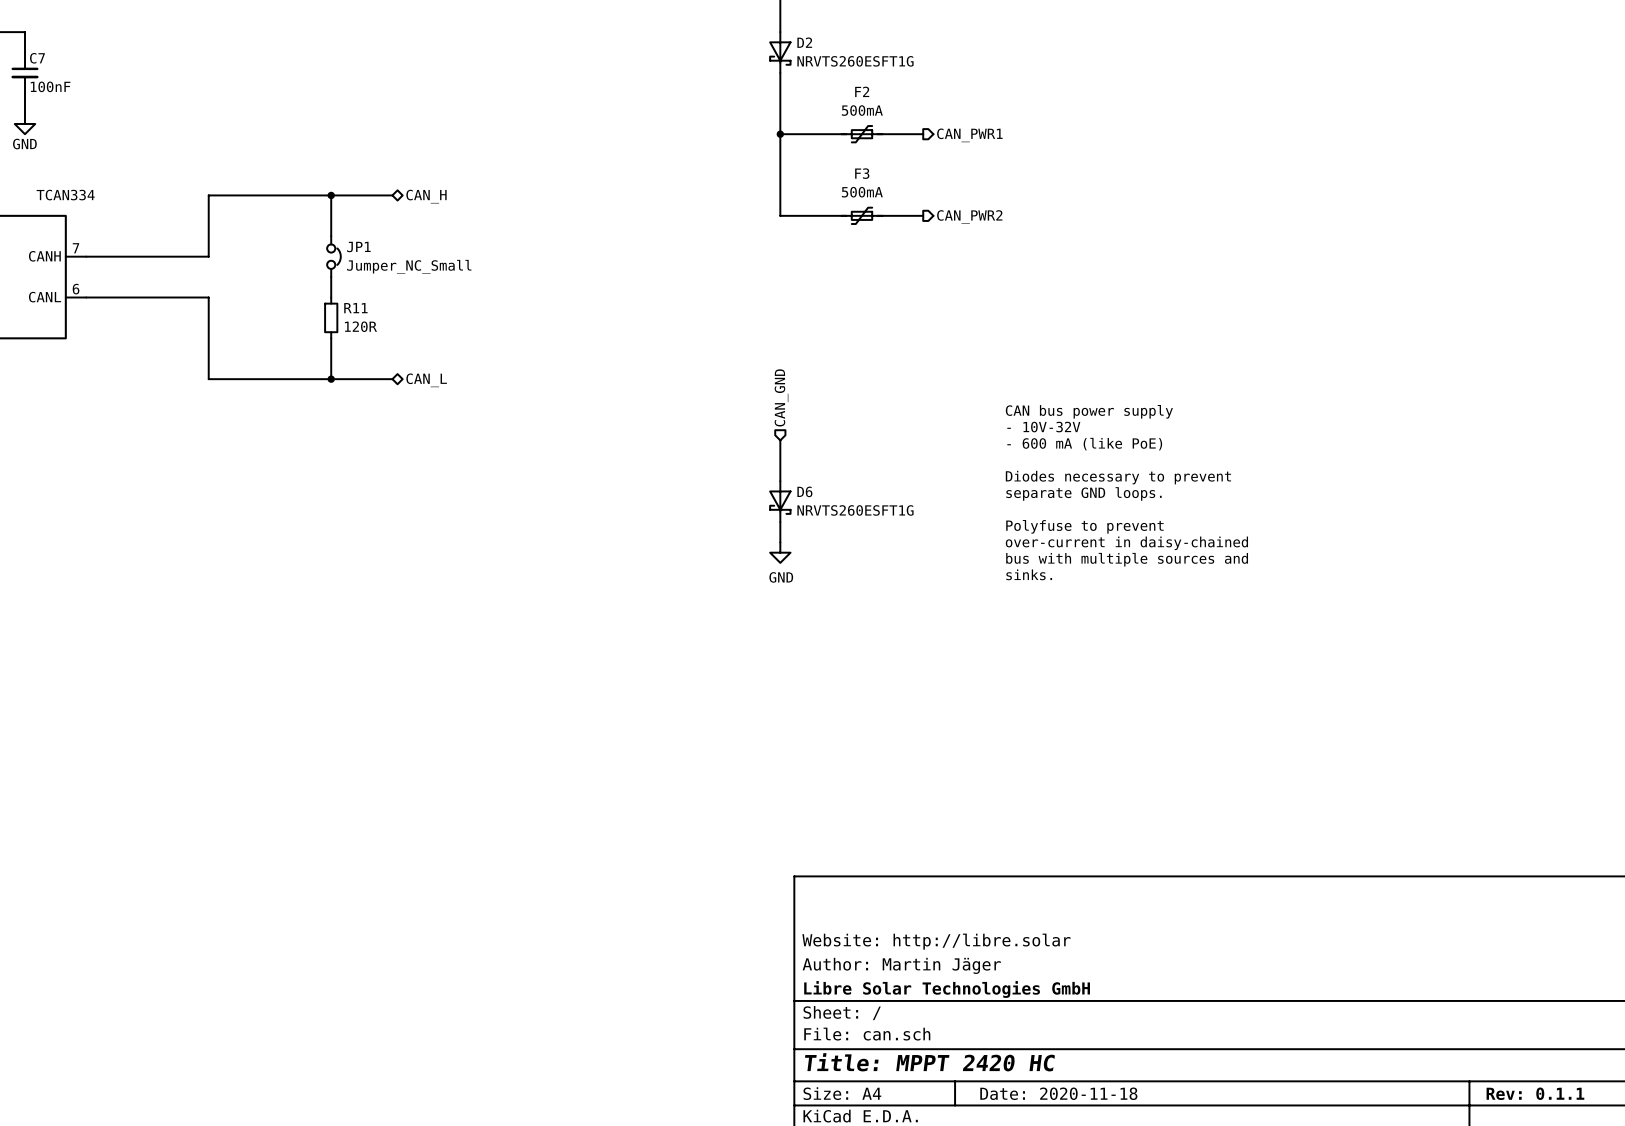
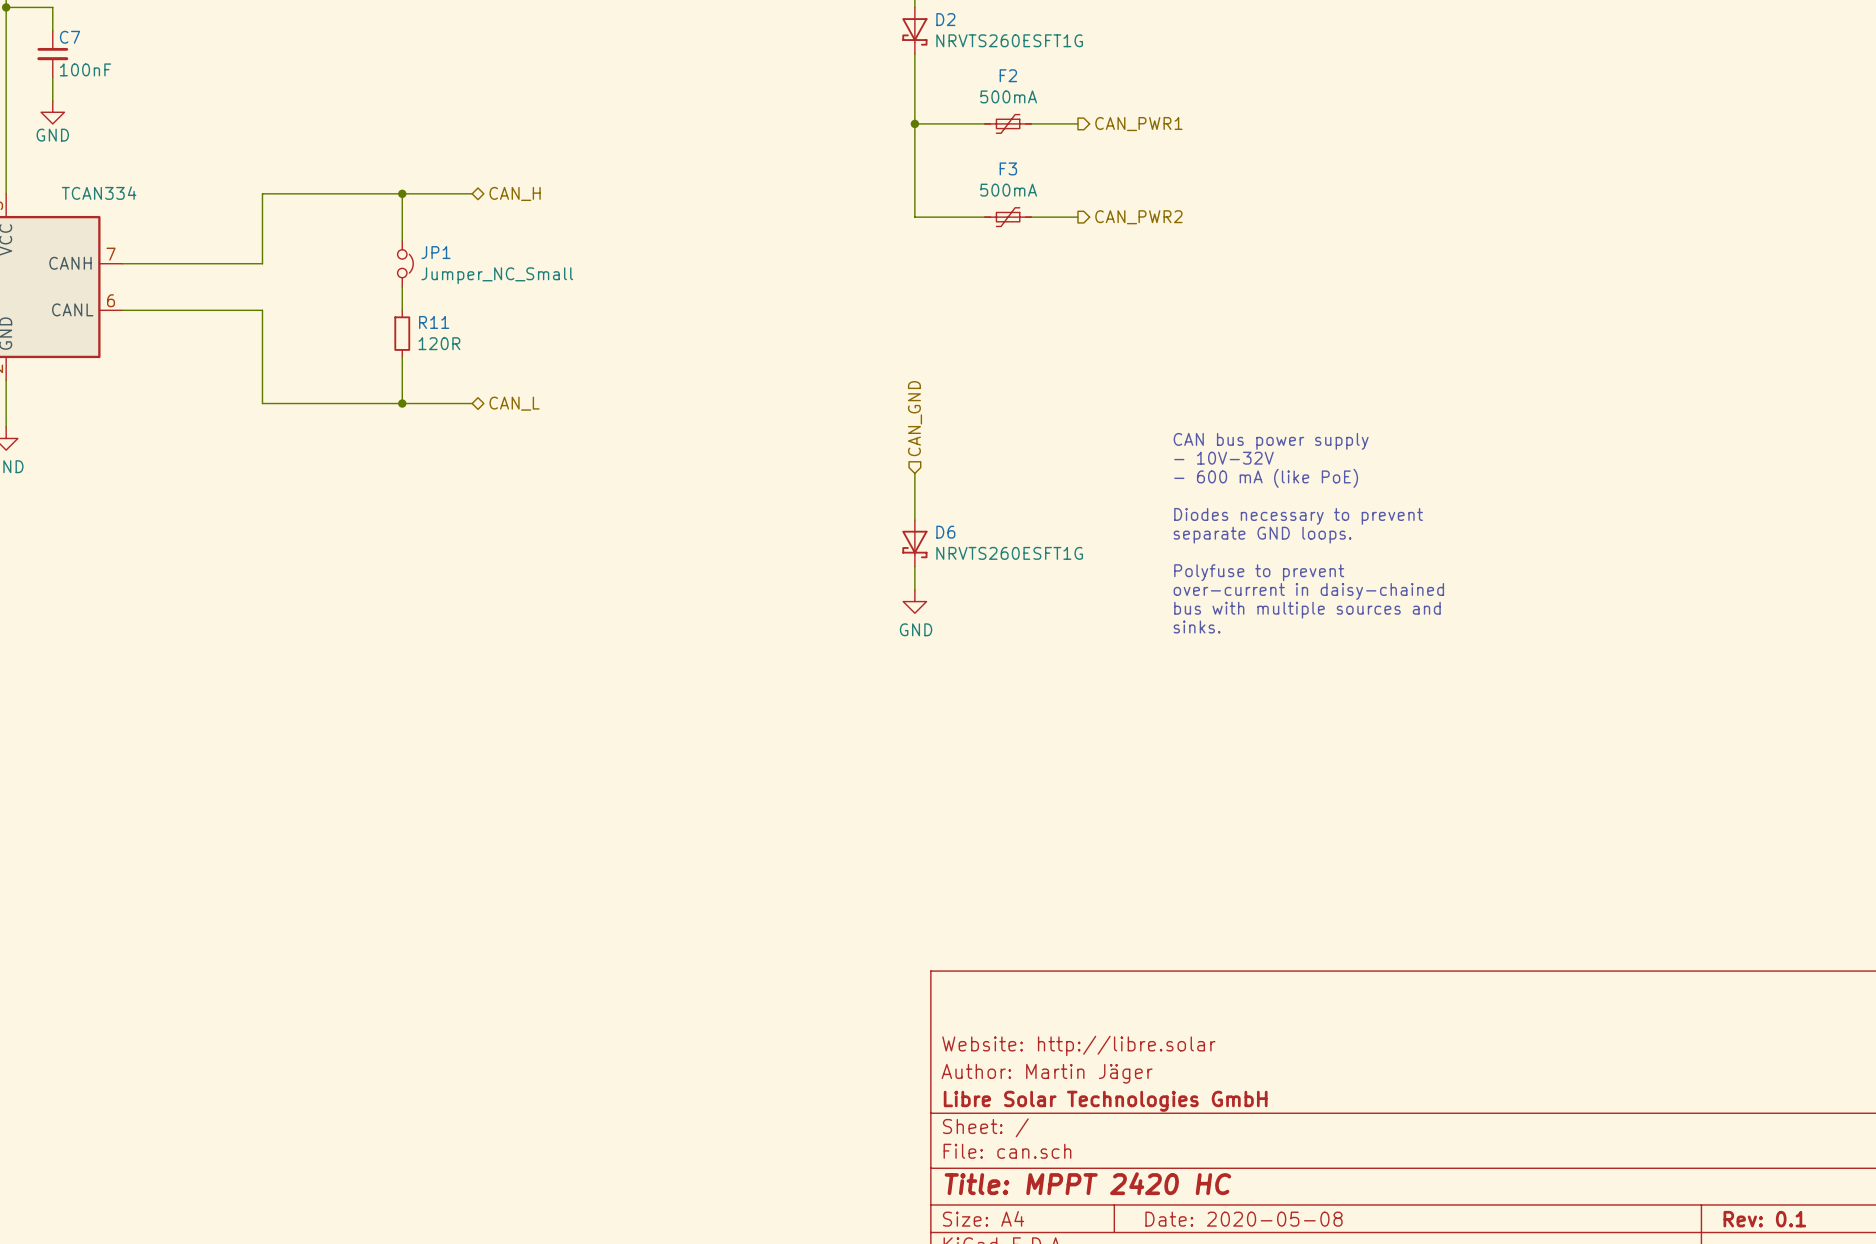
title block: Date: 2020-11-18 (1058, 1093) -> Date: 2020-05-08 (1244, 1219)
title block: Rev: 0.1.1 (1535, 1093) -> Rev: 0.1 (1764, 1219)

